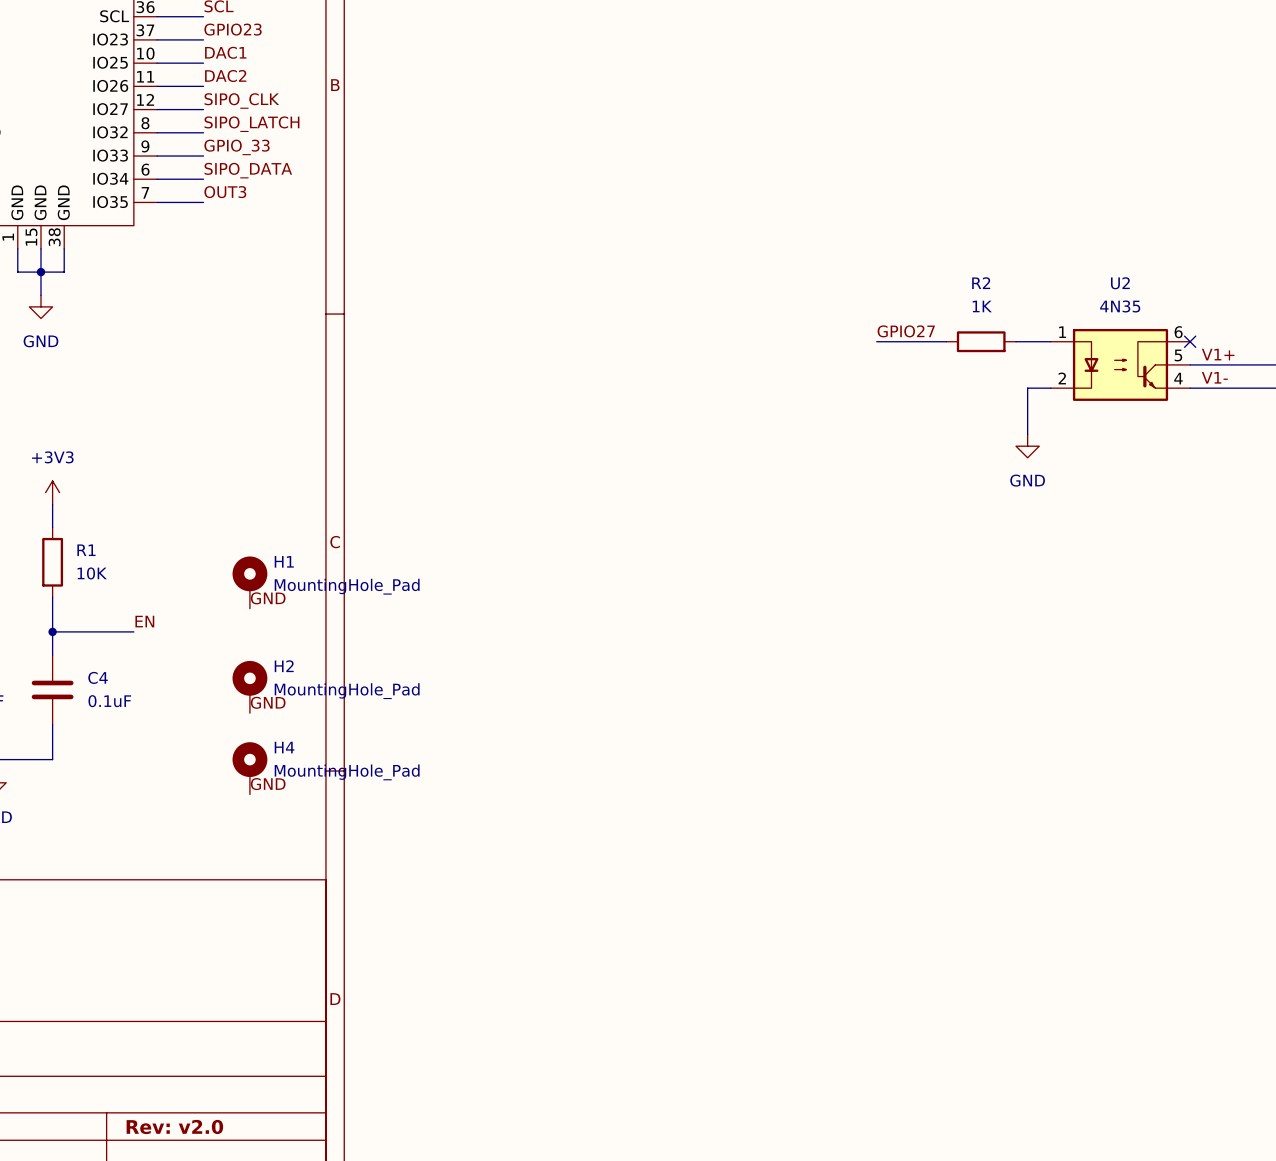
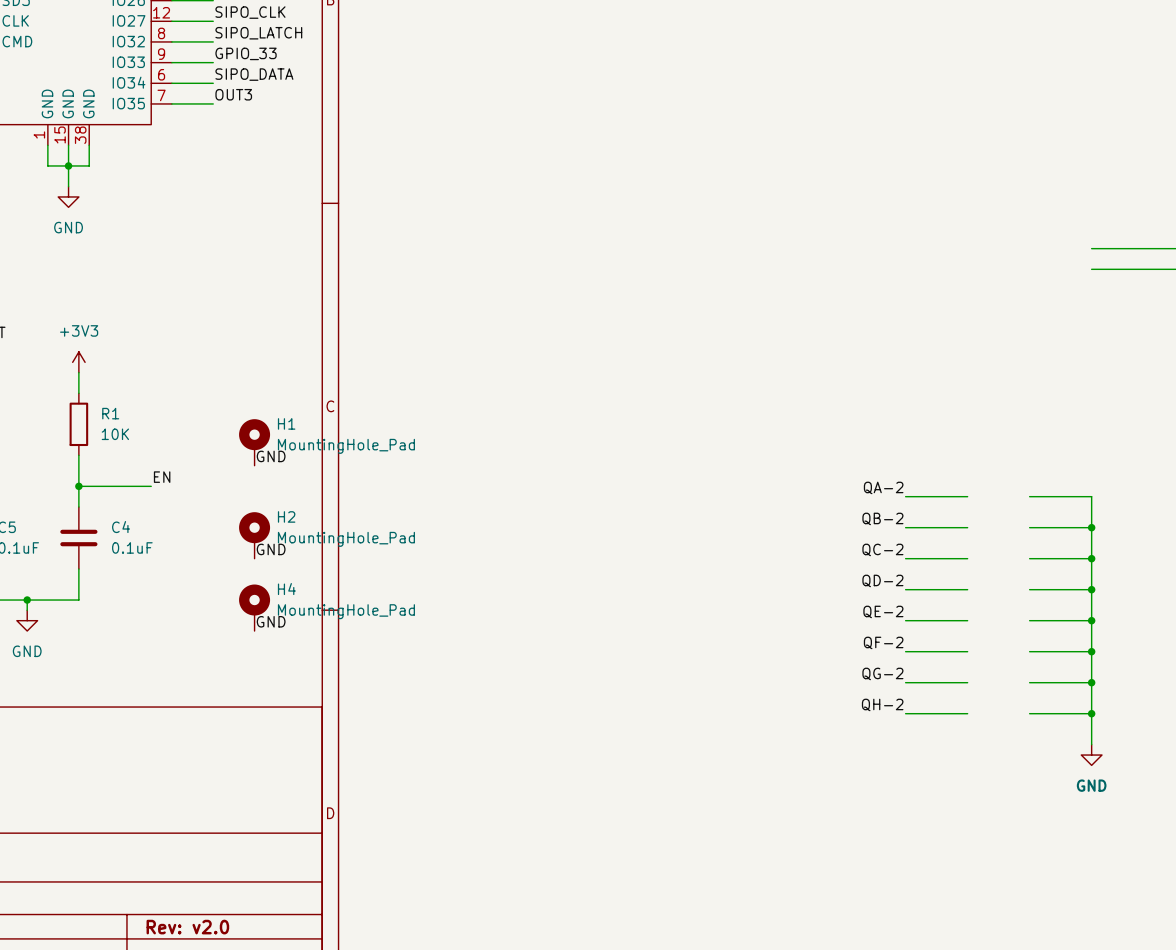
label: GPIO27 (906, 331) -> none
wire: (876, 341) (946, 341) -> none
R2: 1K (981, 341) -> none
wire: (1016, 341) (1050, 341) -> none
no-connect mark: (1190, 341) -> none
label: V1+ (1218, 354) -> none
U2: 4N35 (1120, 364) -> none
label: V1- (1214, 377) -> none
wire: (1050, 388) (1027, 388) (1027, 434) -> none
power symbol: GND (1027, 446) -> none
label: none -> QA-2 (883, 487)
wire: none -> (905, 496) (967, 496)
wire: none -> (1029, 496) (1091, 496) (1091, 744)
label: none -> QB-2 (882, 518)
wire: none -> (905, 527) (967, 527)
wire: none -> (1029, 527) (1091, 527)
junction: none -> (1091, 527)
label: none -> QC-2 (882, 549)
wire: none -> (905, 558) (967, 558)
wire: none -> (1029, 558) (1091, 558)
junction: none -> (1091, 558)
label: none -> QD-2 (882, 580)
wire: none -> (905, 589) (967, 589)
wire: none -> (1029, 589) (1091, 589)
junction: none -> (1091, 589)
label: none -> QE-2 (883, 611)
wire: none -> (905, 620) (967, 620)
wire: none -> (1029, 620) (1091, 620)
junction: none -> (1091, 620)
label: none -> QF-2 (883, 642)
wire: none -> (905, 651) (967, 651)
wire: none -> (1029, 651) (1091, 651)
junction: none -> (1091, 651)
label: none -> QG-2 (882, 673)
wire: none -> (905, 682) (967, 682)
wire: none -> (1029, 682) (1091, 682)
junction: none -> (1091, 682)
label: none -> QH-2 (882, 704)
wire: none -> (905, 713) (967, 713)
wire: none -> (1029, 713) (1091, 713)
junction: none -> (1091, 713)
power symbol: none -> GND (1091, 755)

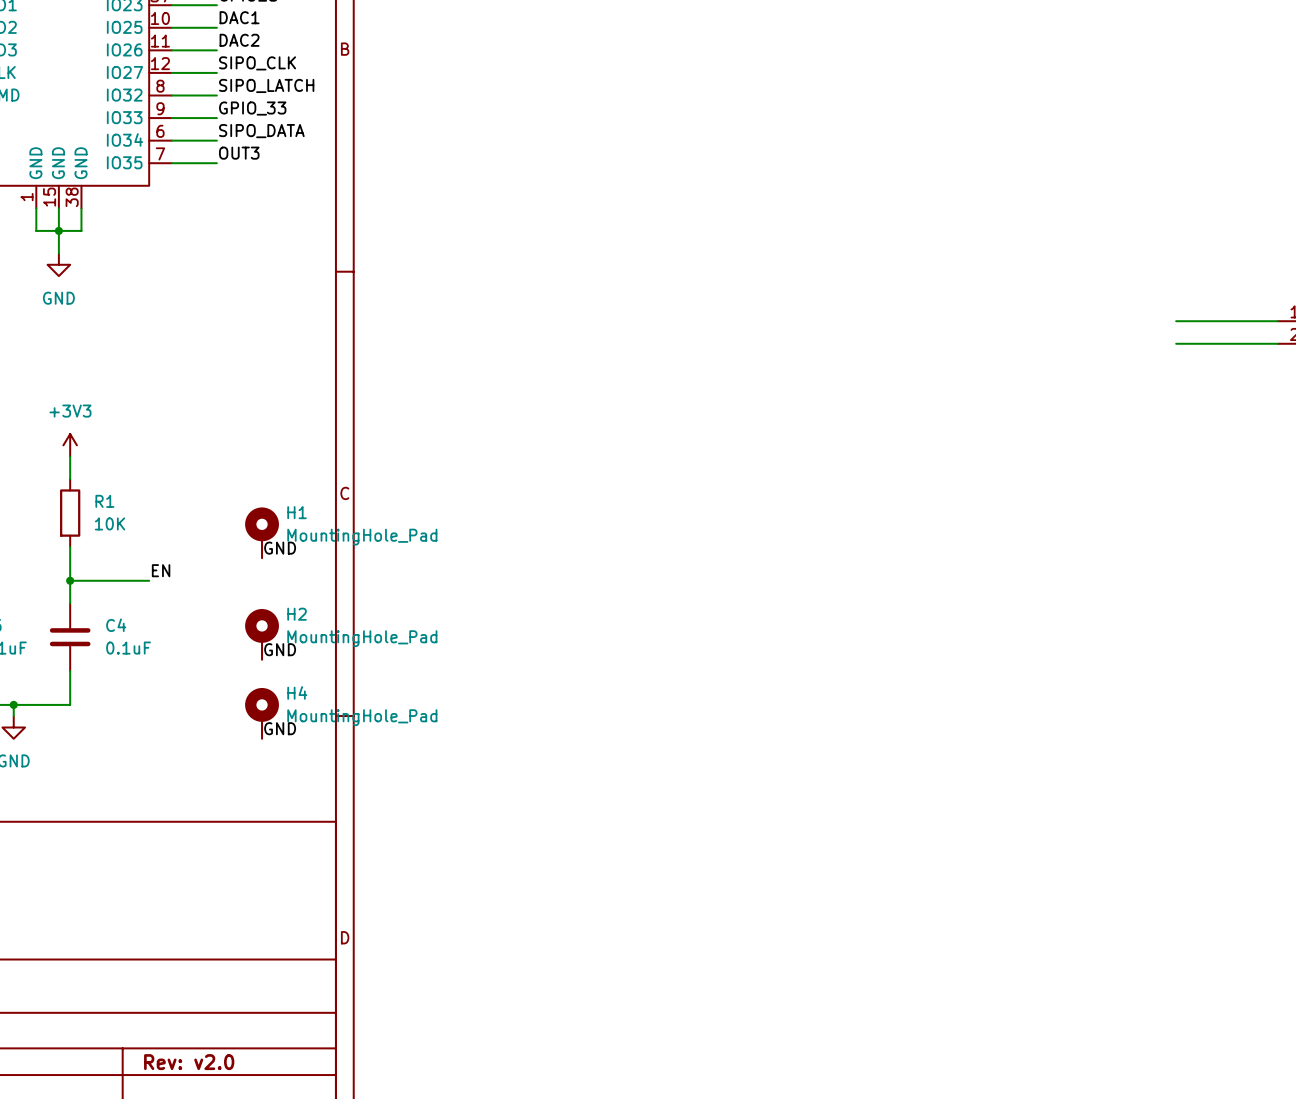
label: QA-2 (883, 487) -> none
wire: (905, 496) (967, 496) -> none
wire: (1029, 496) (1091, 496) (1091, 744) -> none
label: QB-2 (882, 518) -> none
wire: (905, 527) (967, 527) -> none
wire: (1029, 527) (1091, 527) -> none
junction: (1091, 527) -> none
label: QC-2 (882, 549) -> none
wire: (905, 558) (967, 558) -> none
wire: (1029, 558) (1091, 558) -> none
junction: (1091, 558) -> none
label: QD-2 (882, 580) -> none
wire: (905, 589) (967, 589) -> none
wire: (1029, 589) (1091, 589) -> none
junction: (1091, 589) -> none
label: QE-2 (883, 611) -> none
wire: (905, 620) (967, 620) -> none
wire: (1029, 620) (1091, 620) -> none
junction: (1091, 620) -> none
label: QF-2 (883, 642) -> none
wire: (905, 651) (967, 651) -> none
wire: (1029, 651) (1091, 651) -> none
junction: (1091, 651) -> none
label: QG-2 (882, 673) -> none
wire: (905, 682) (967, 682) -> none
wire: (1029, 682) (1091, 682) -> none
junction: (1091, 682) -> none
label: QH-2 (882, 704) -> none
wire: (905, 713) (967, 713) -> none
wire: (1029, 713) (1091, 713) -> none
junction: (1091, 713) -> none
power symbol: GND (1091, 755) -> none

